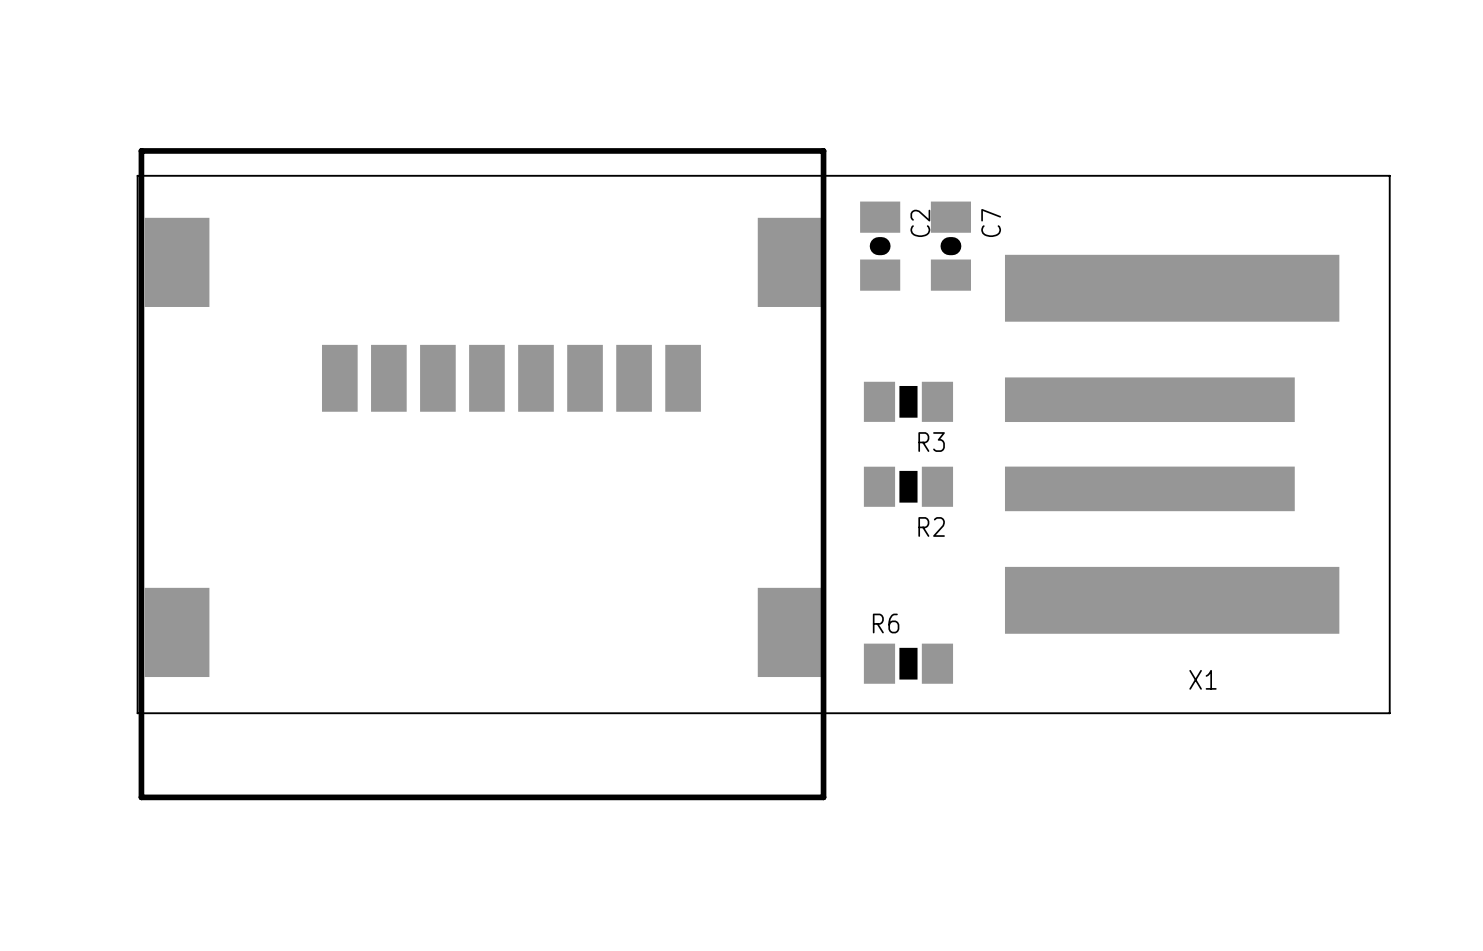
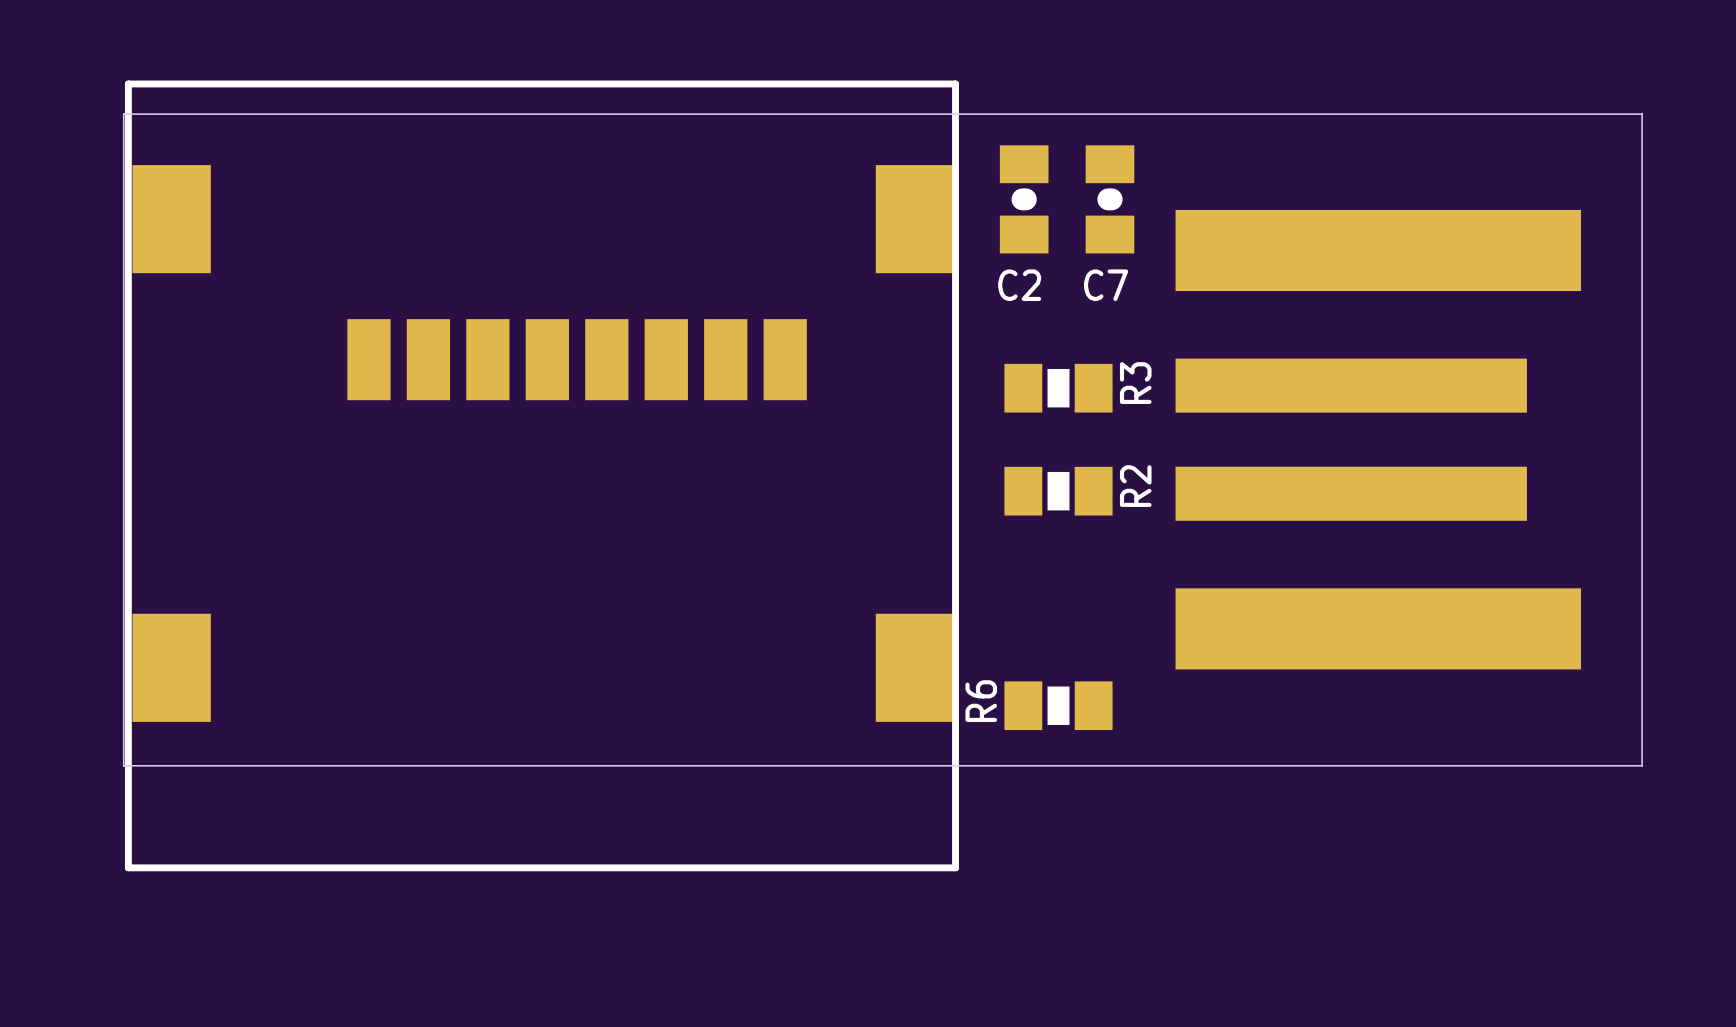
C7 name rotation: 0° (991, 222) -> 90° clockwise (1106, 285)
C7 name position: C7 (991, 222) -> C7 (1106, 285)
C2 name rotation: 0° (920, 223) -> 90° clockwise (1019, 285)
C2 name position: C2 (920, 223) -> C2 (1019, 285)
R3 name rotation: 0° (931, 442) -> 90° counterclockwise (1135, 383)
R3 name position: R3 (931, 442) -> R3 (1135, 383)
R2 name rotation: 0° (931, 526) -> 90° counterclockwise (1135, 486)
R2 name position: R2 (931, 526) -> R2 (1135, 486)
R6 name rotation: 0° (886, 623) -> 90° counterclockwise (981, 701)
R6 name position: R6 (886, 623) -> R6 (981, 701)
X1 name: X1 (1203, 679) -> none

